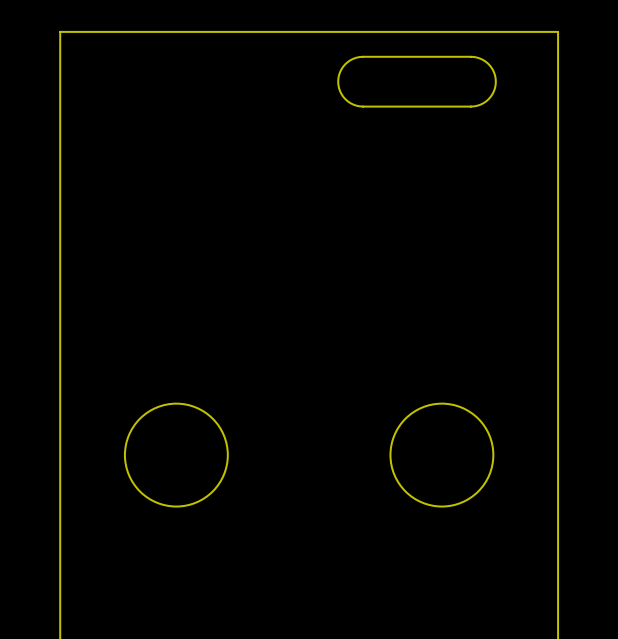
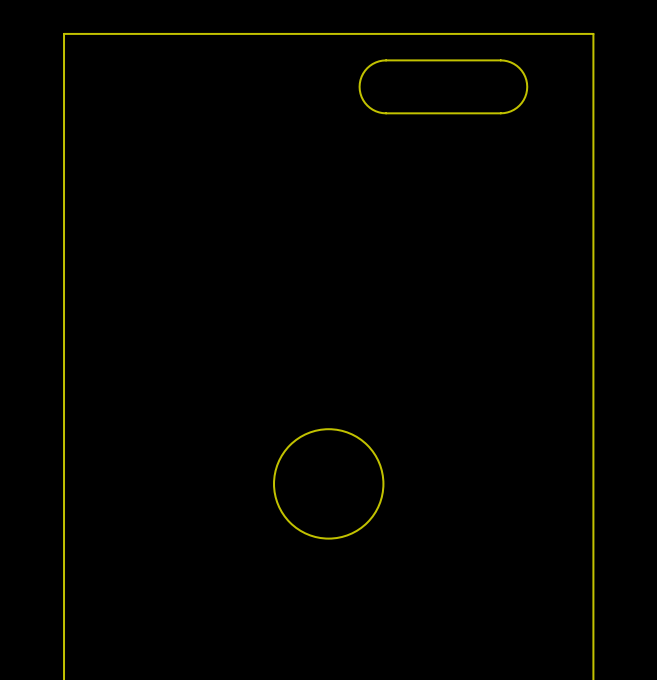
round board edge: [124, 402, 229, 508] -> none
round board edge: none -> [273, 428, 385, 540]
round board edge: [389, 402, 495, 508] -> none

